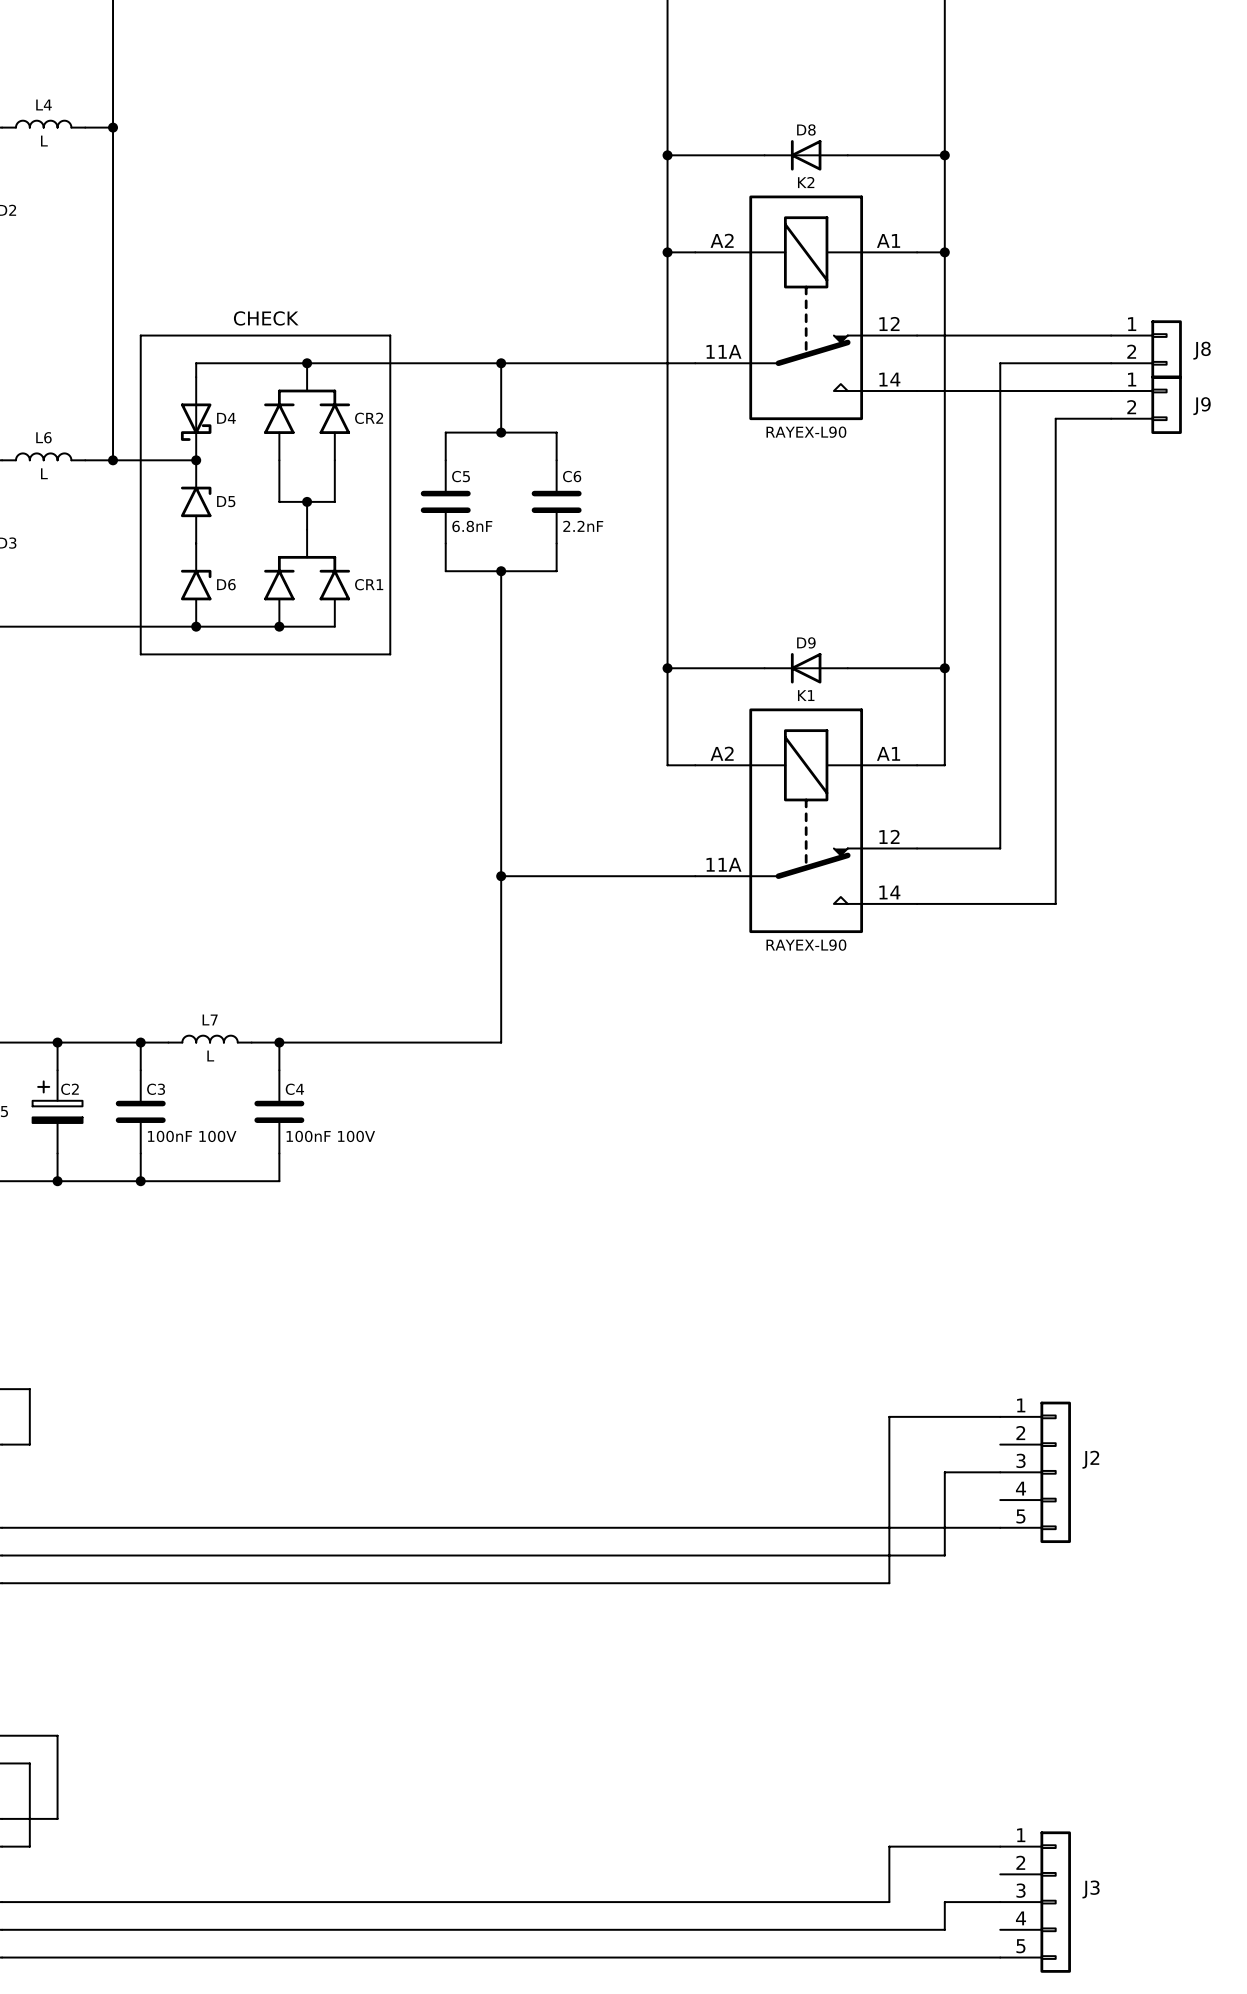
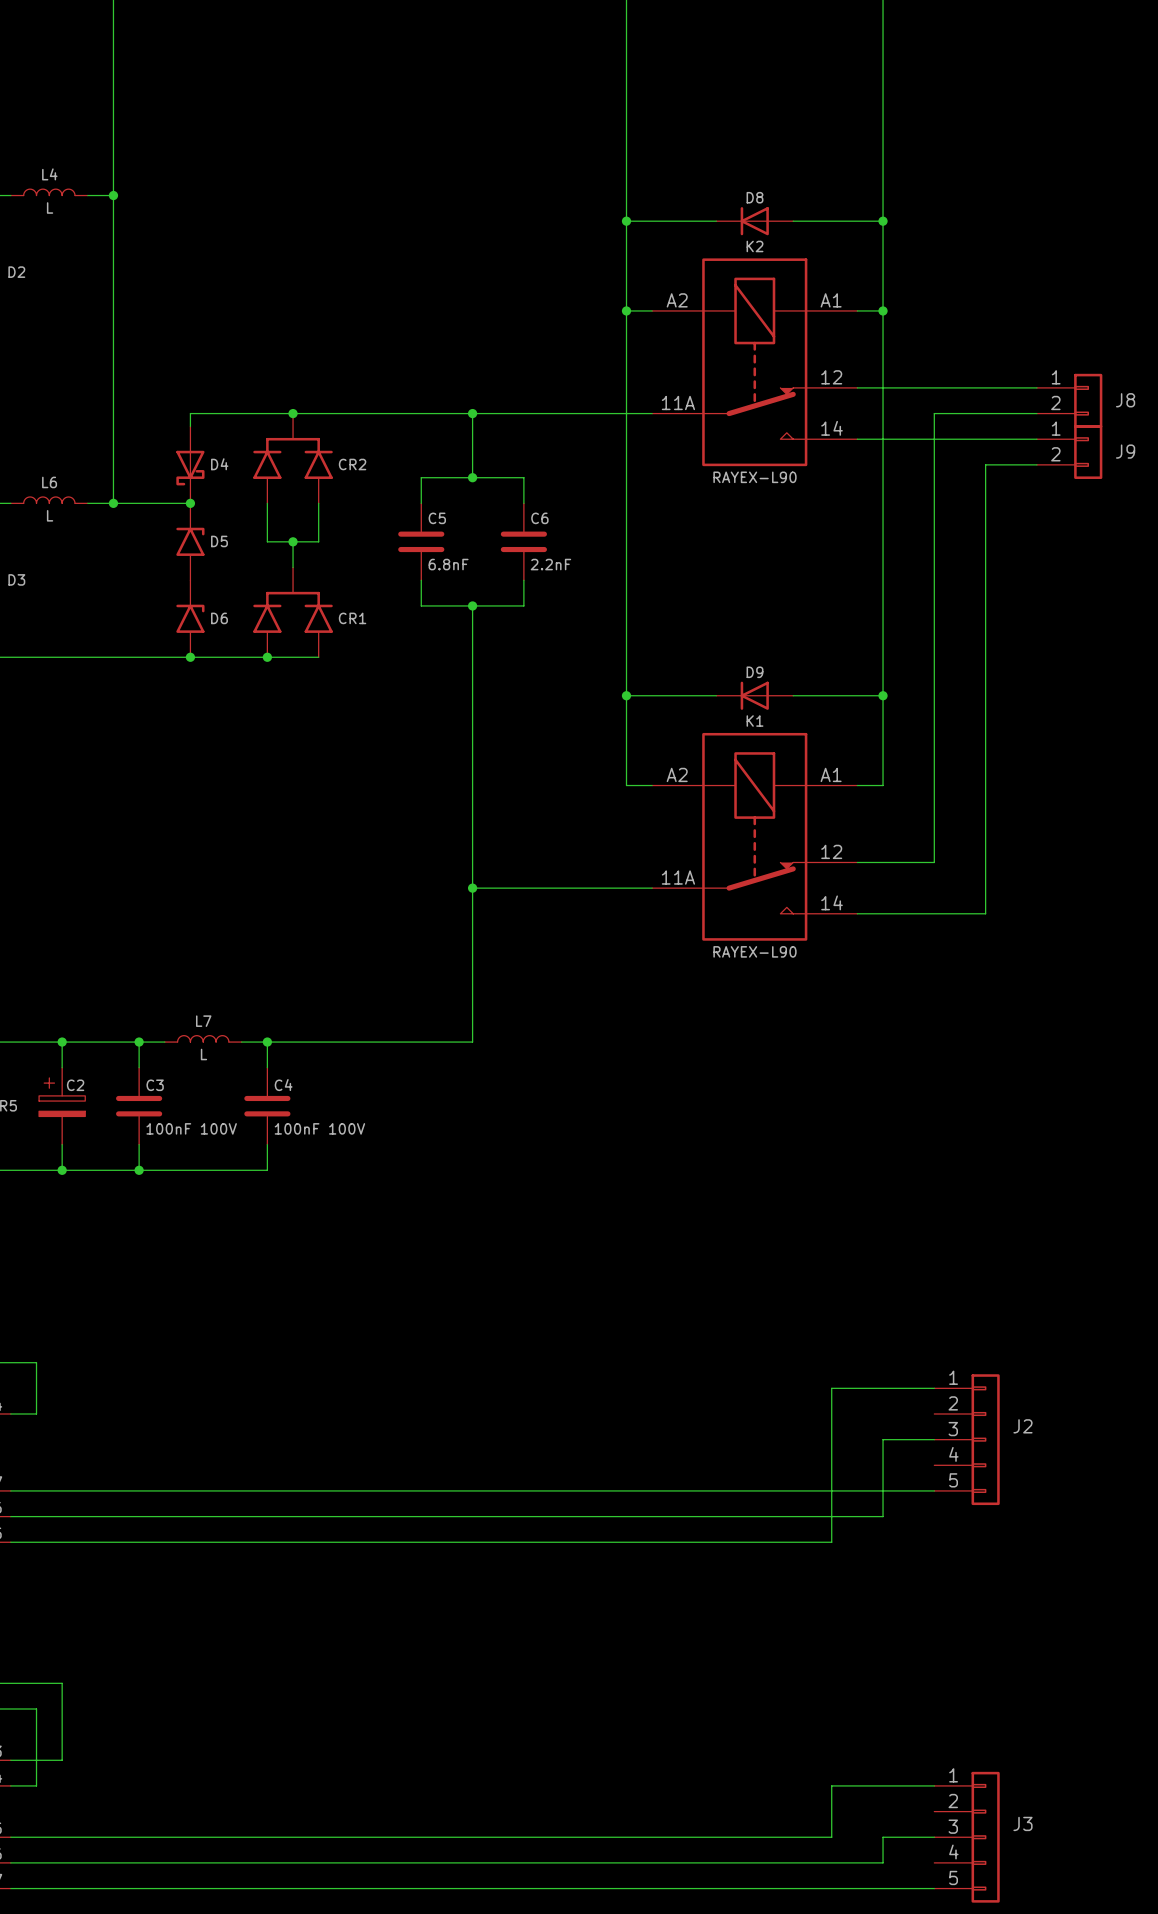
text: CHECK (266, 318) -> none
line: (140, 335) (390, 335) (390, 654) (140, 654) (140, 335) -> none

